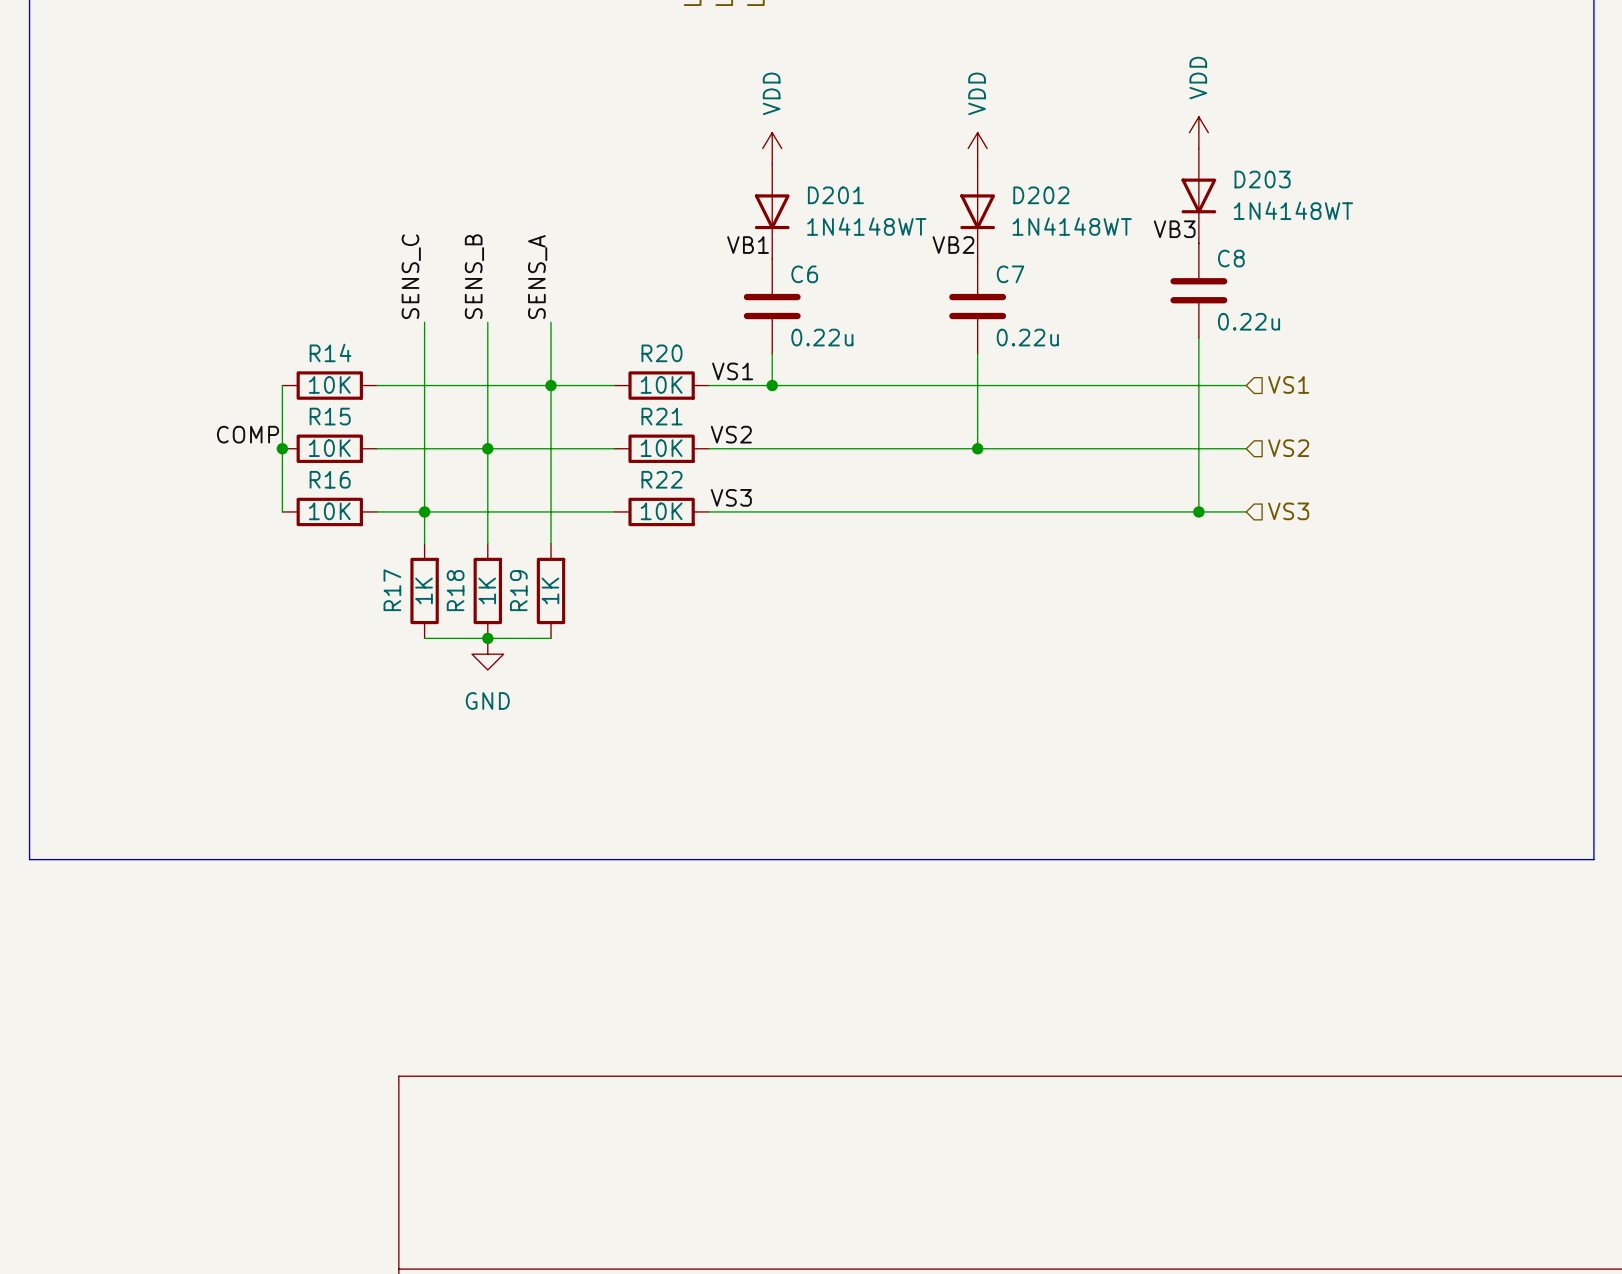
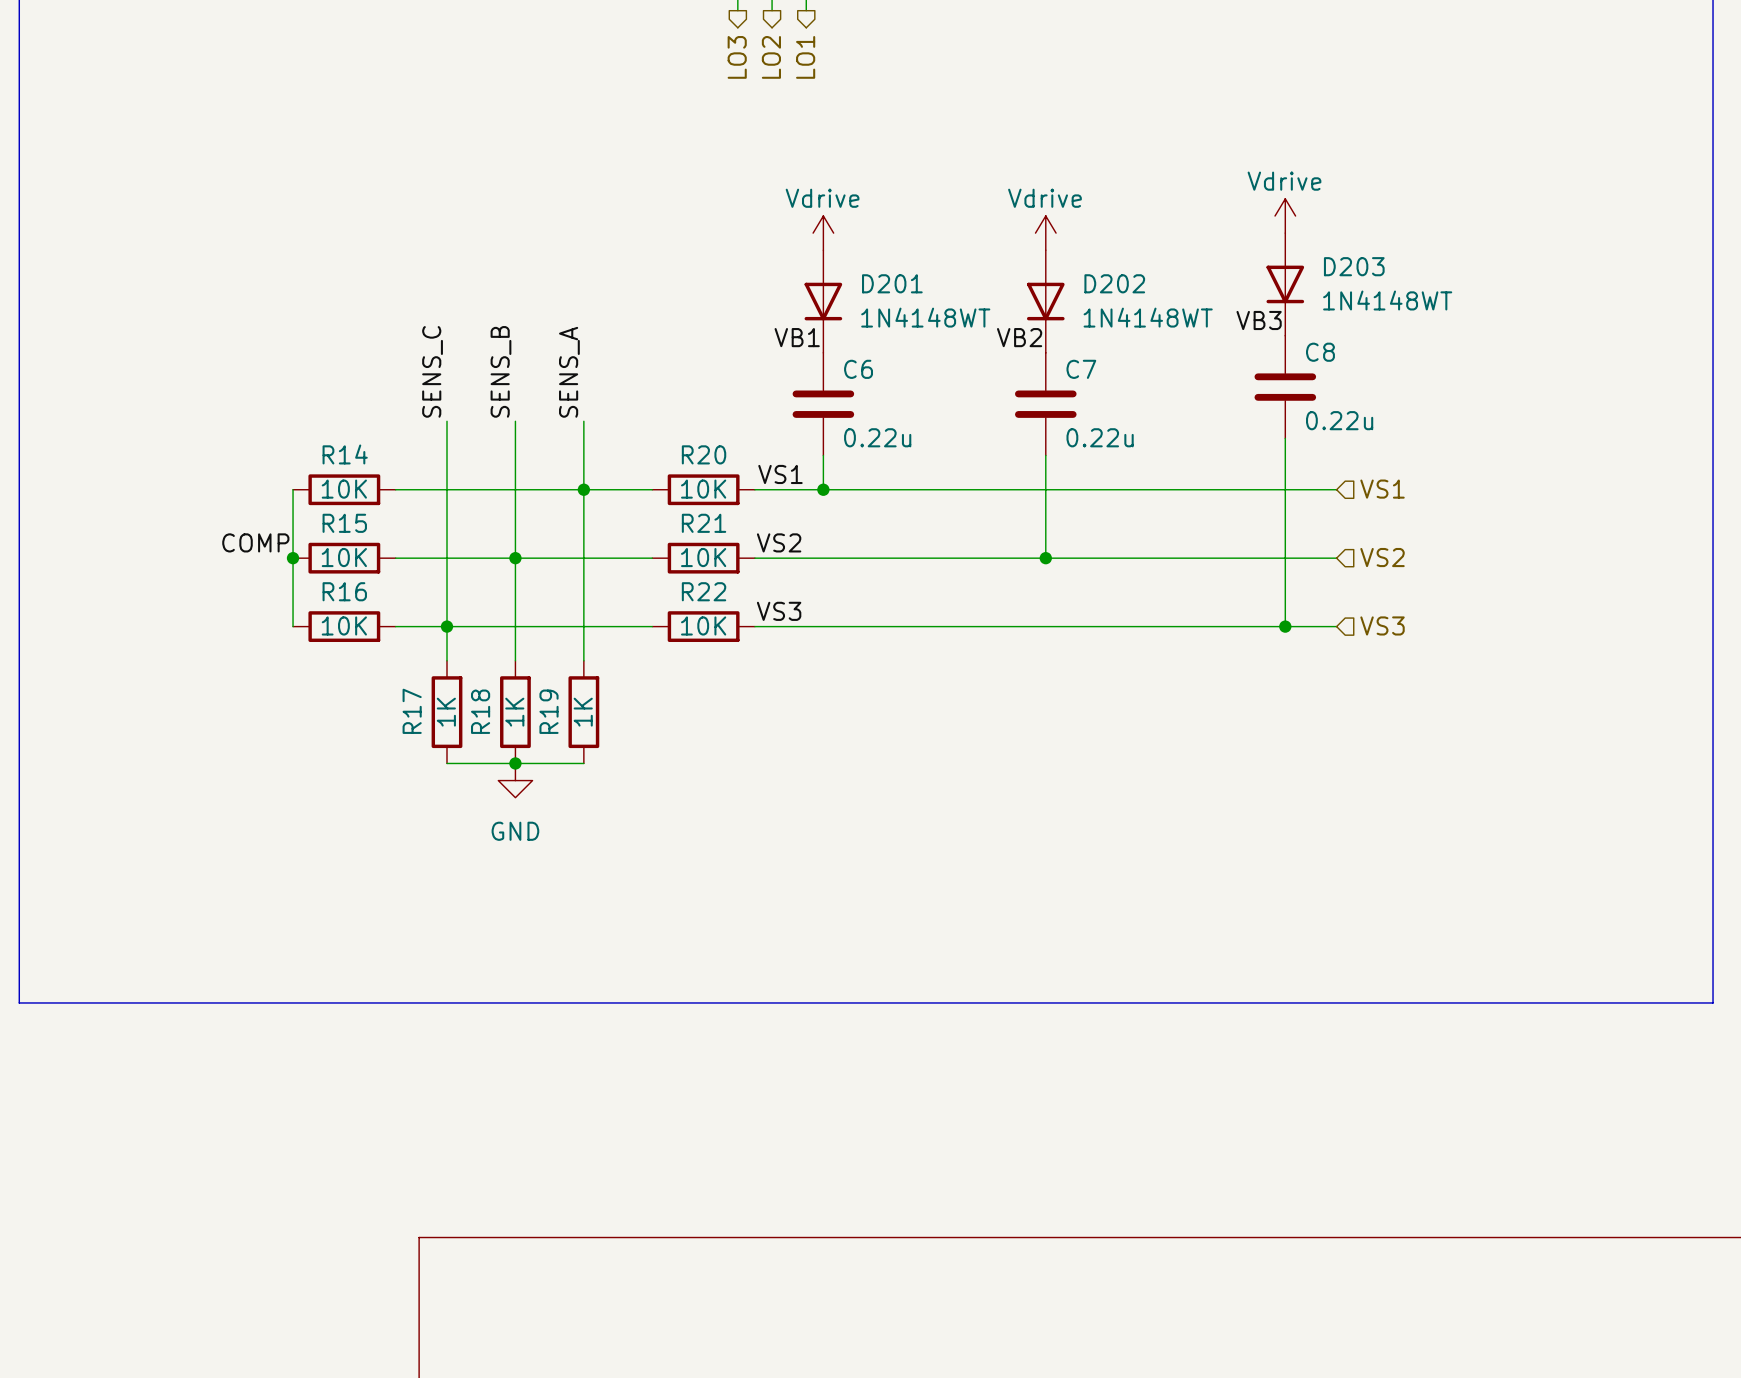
power symbol: VDD (1198, 132) -> Vdrive (1285, 216)
power symbol: VDD (772, 148) -> Vdrive (823, 233)
power symbol: VDD (977, 148) -> Vdrive (1045, 233)

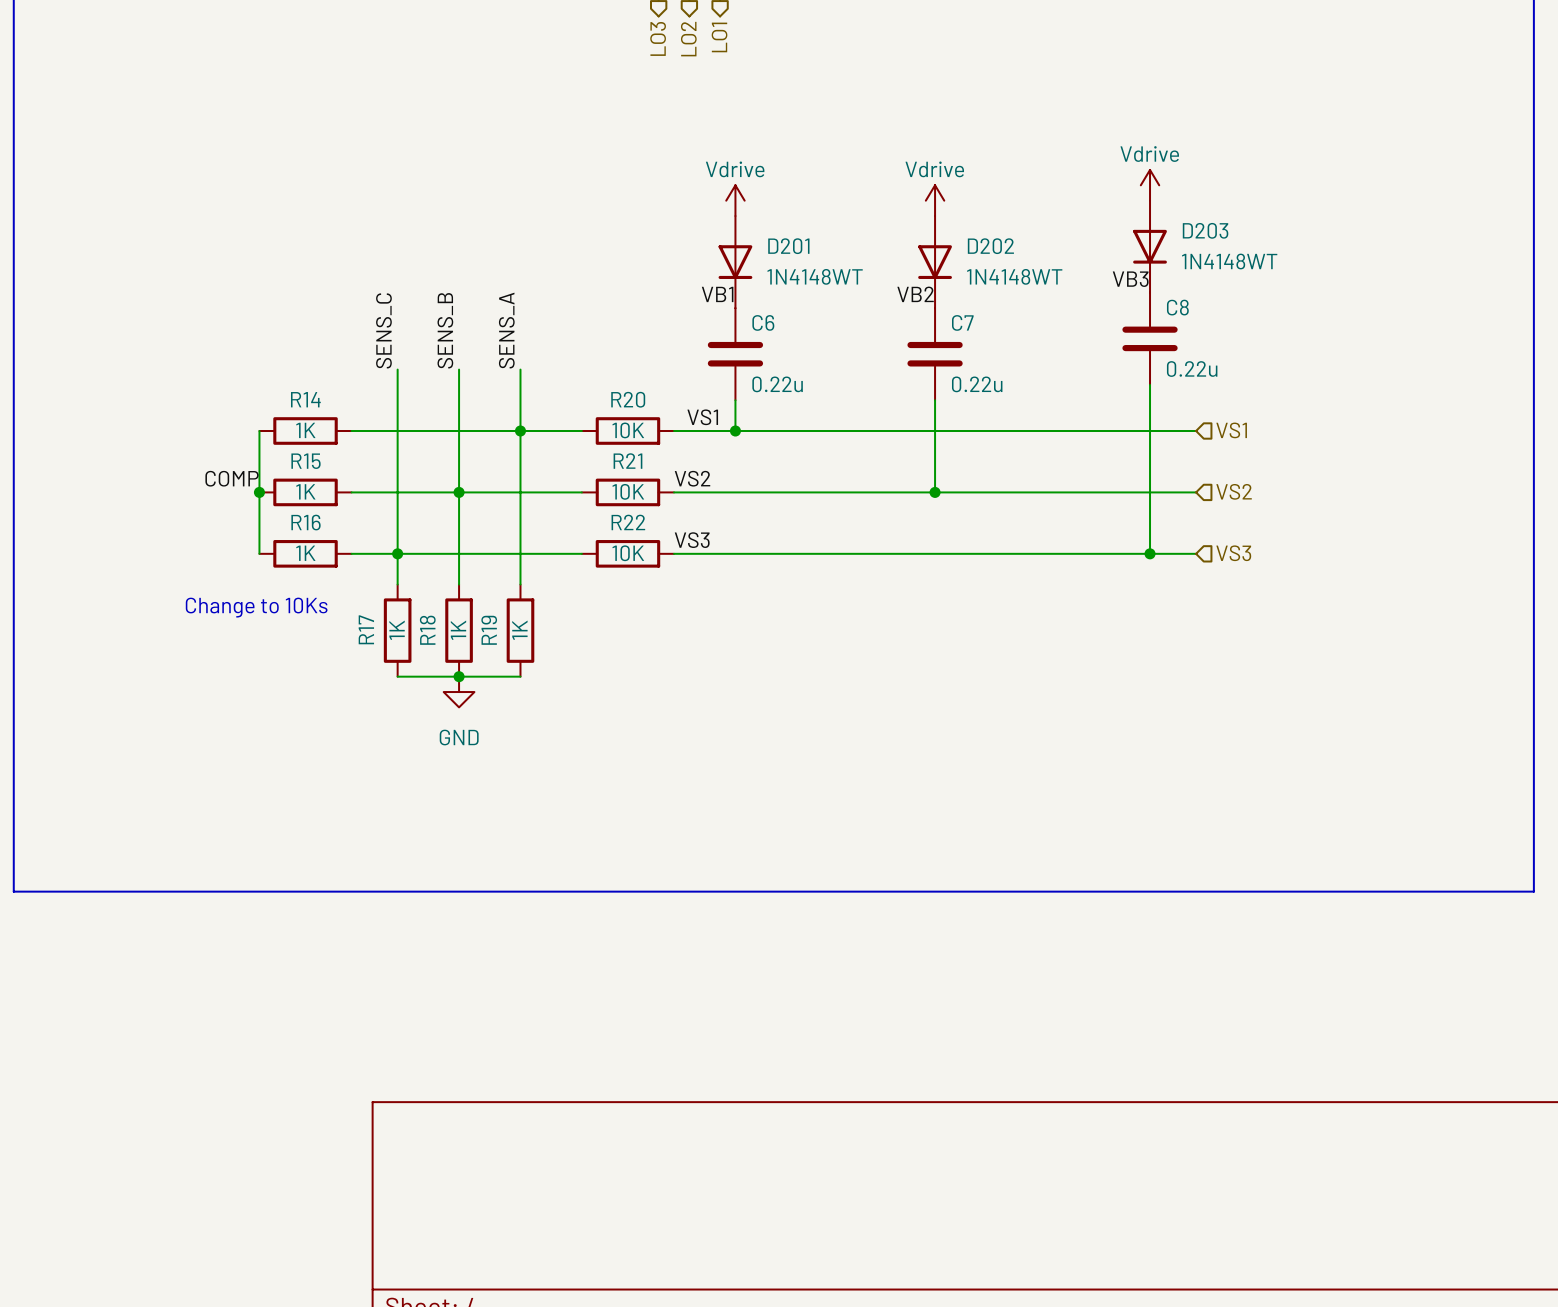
R14 value: 10K (344, 489) -> 1K (305, 430)
R15 value: 10K (344, 557) -> 1K (305, 491)
R16 value: 10K (344, 625) -> 1K (305, 553)
text: none -> Change to 10Ks (256, 607)

